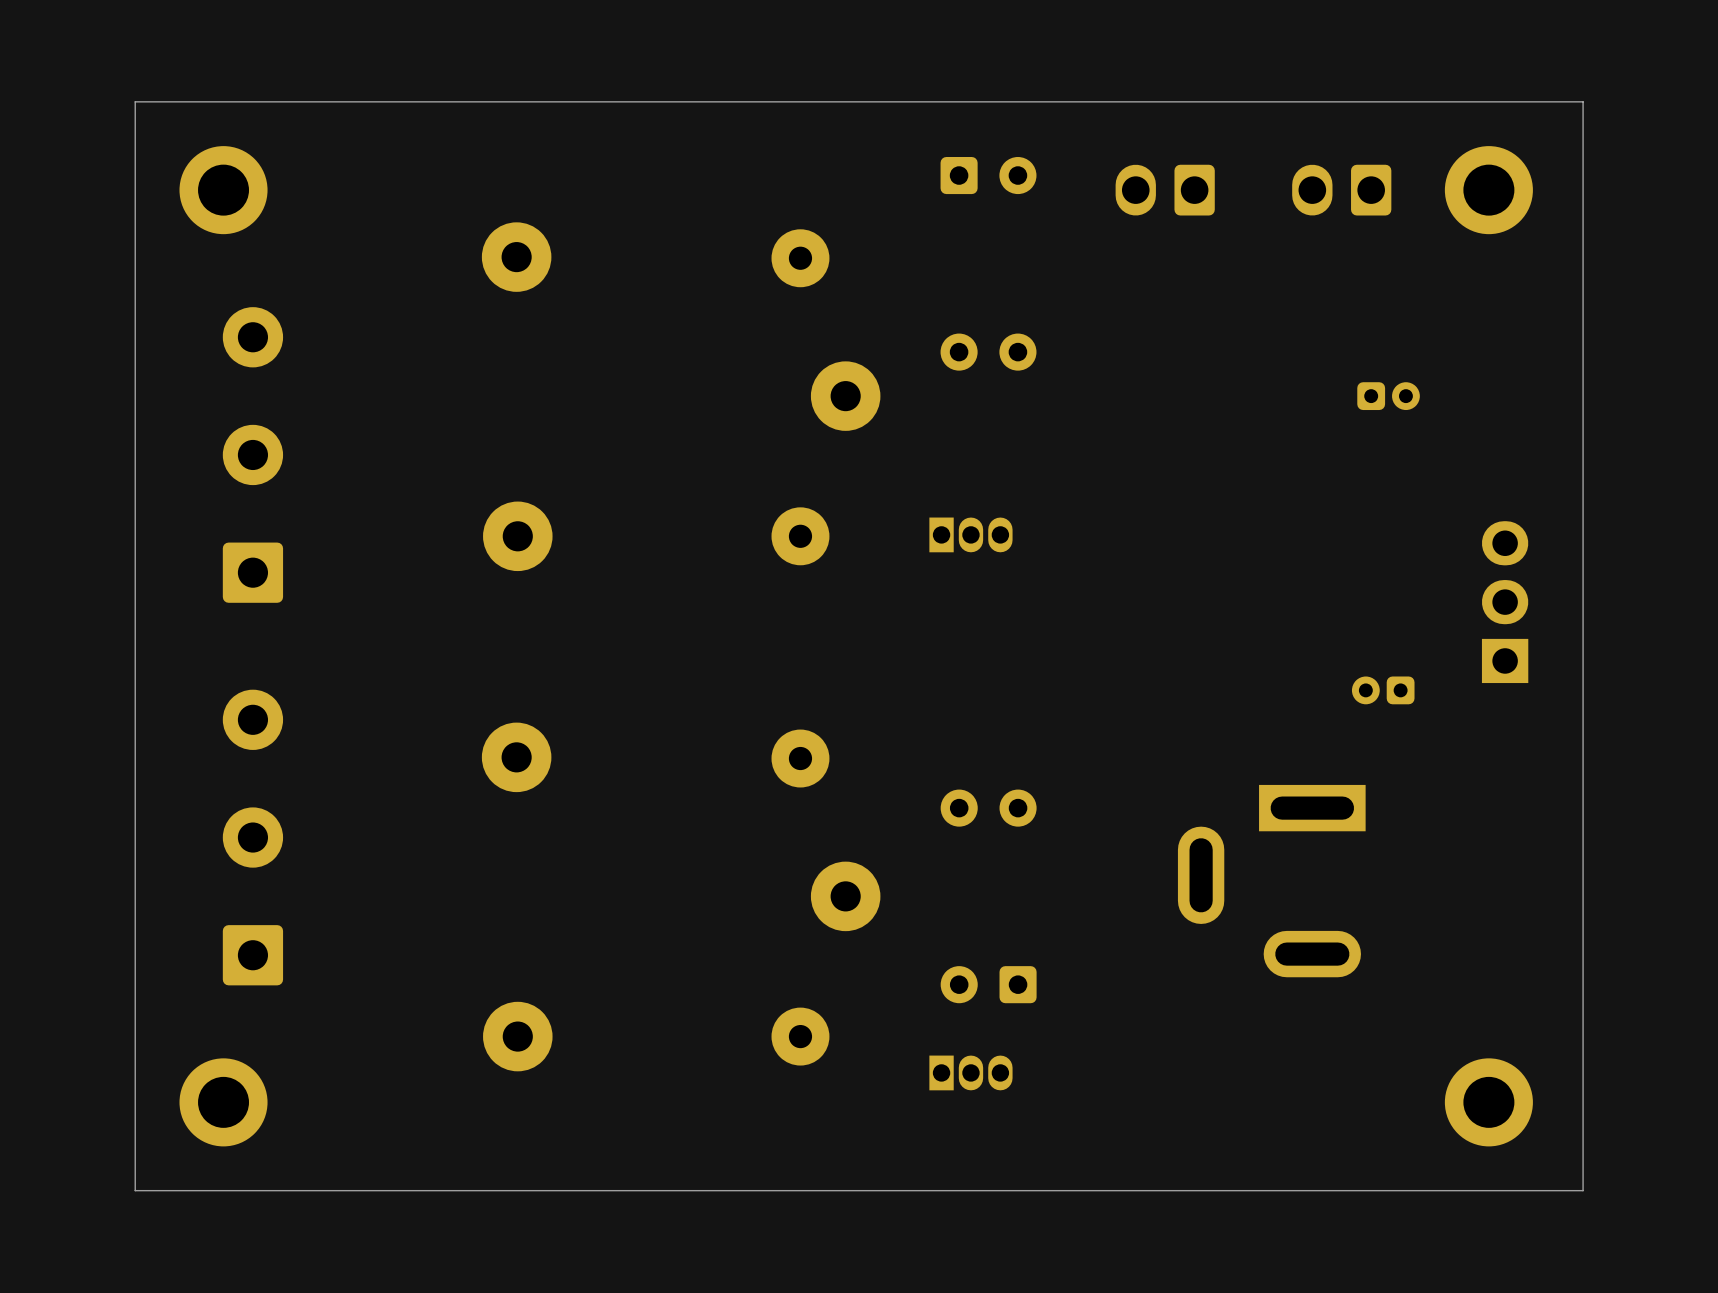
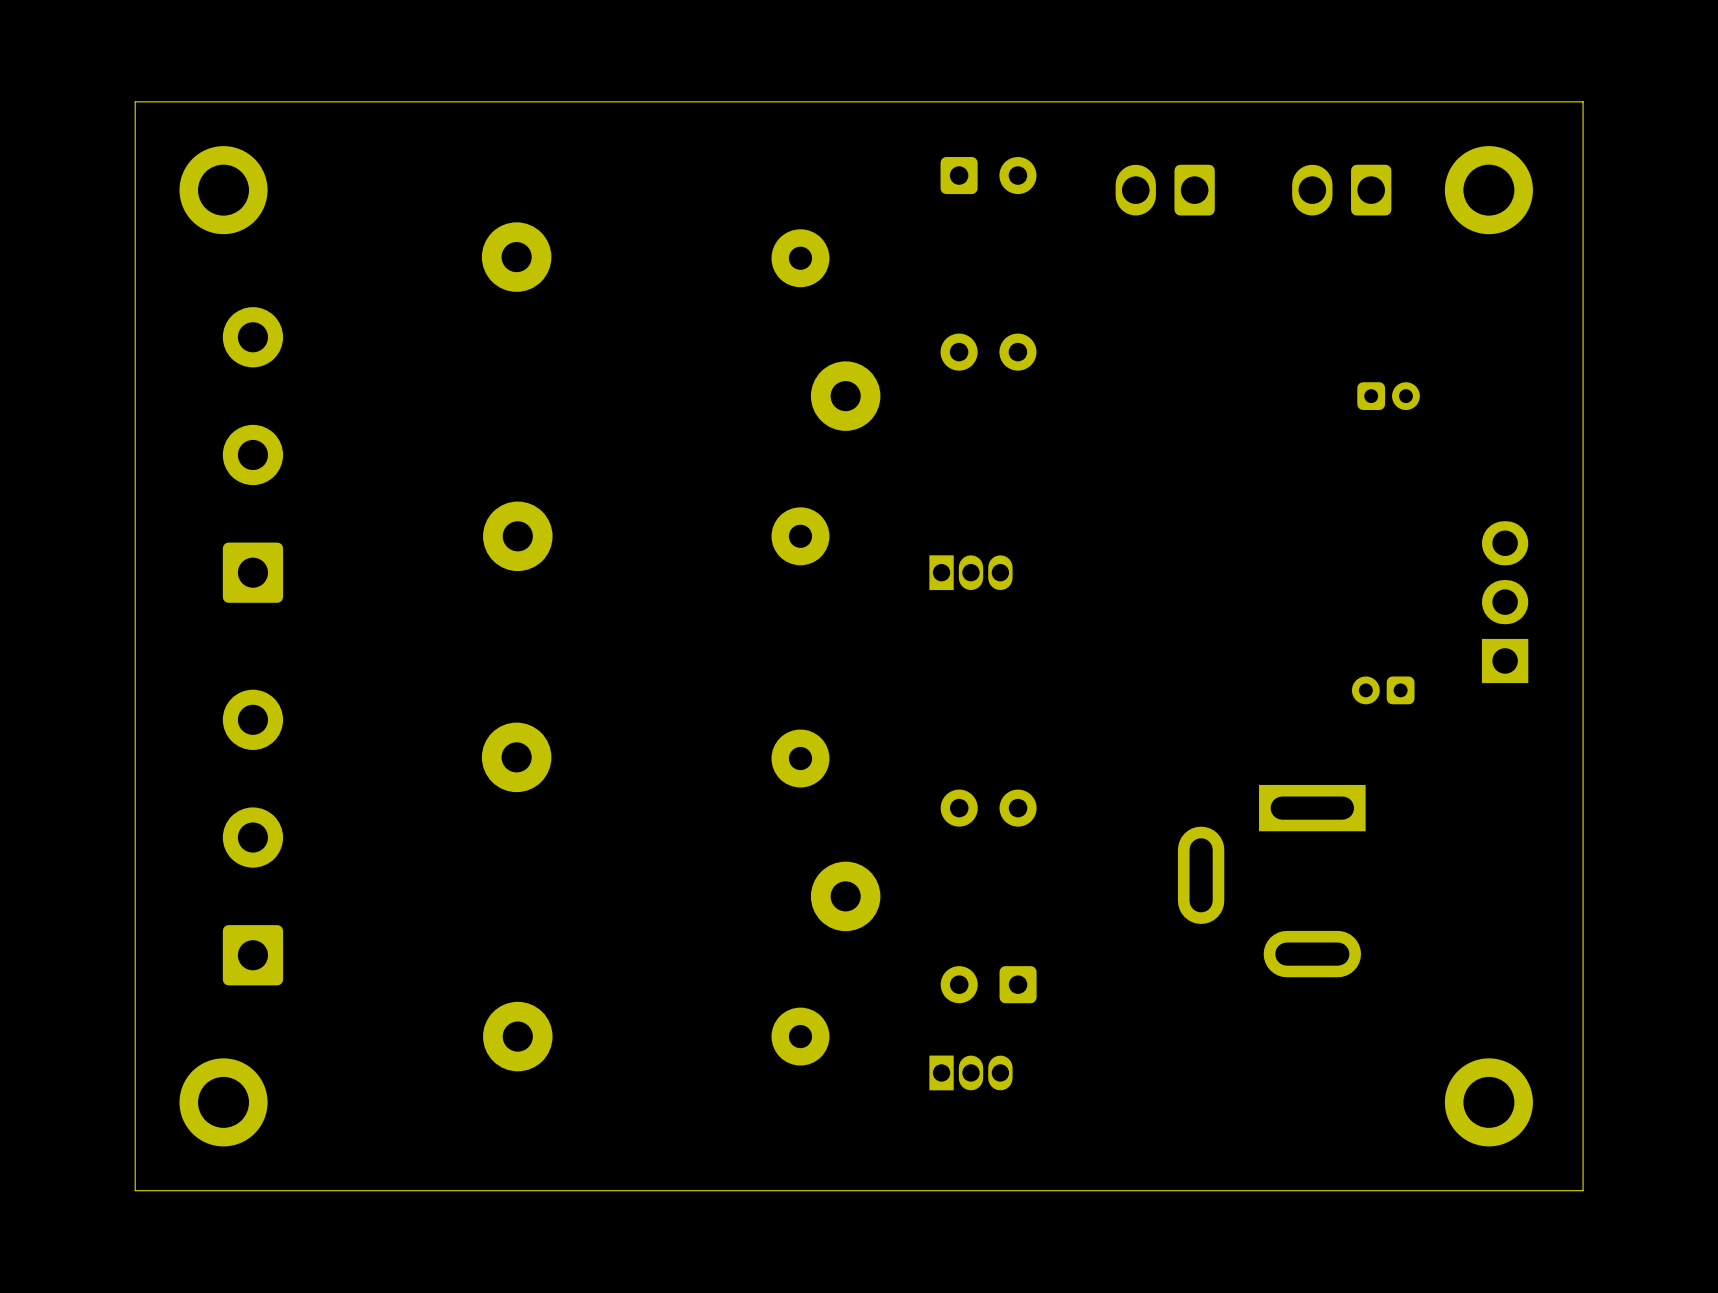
part position: (970, 534) -> (970, 572)

